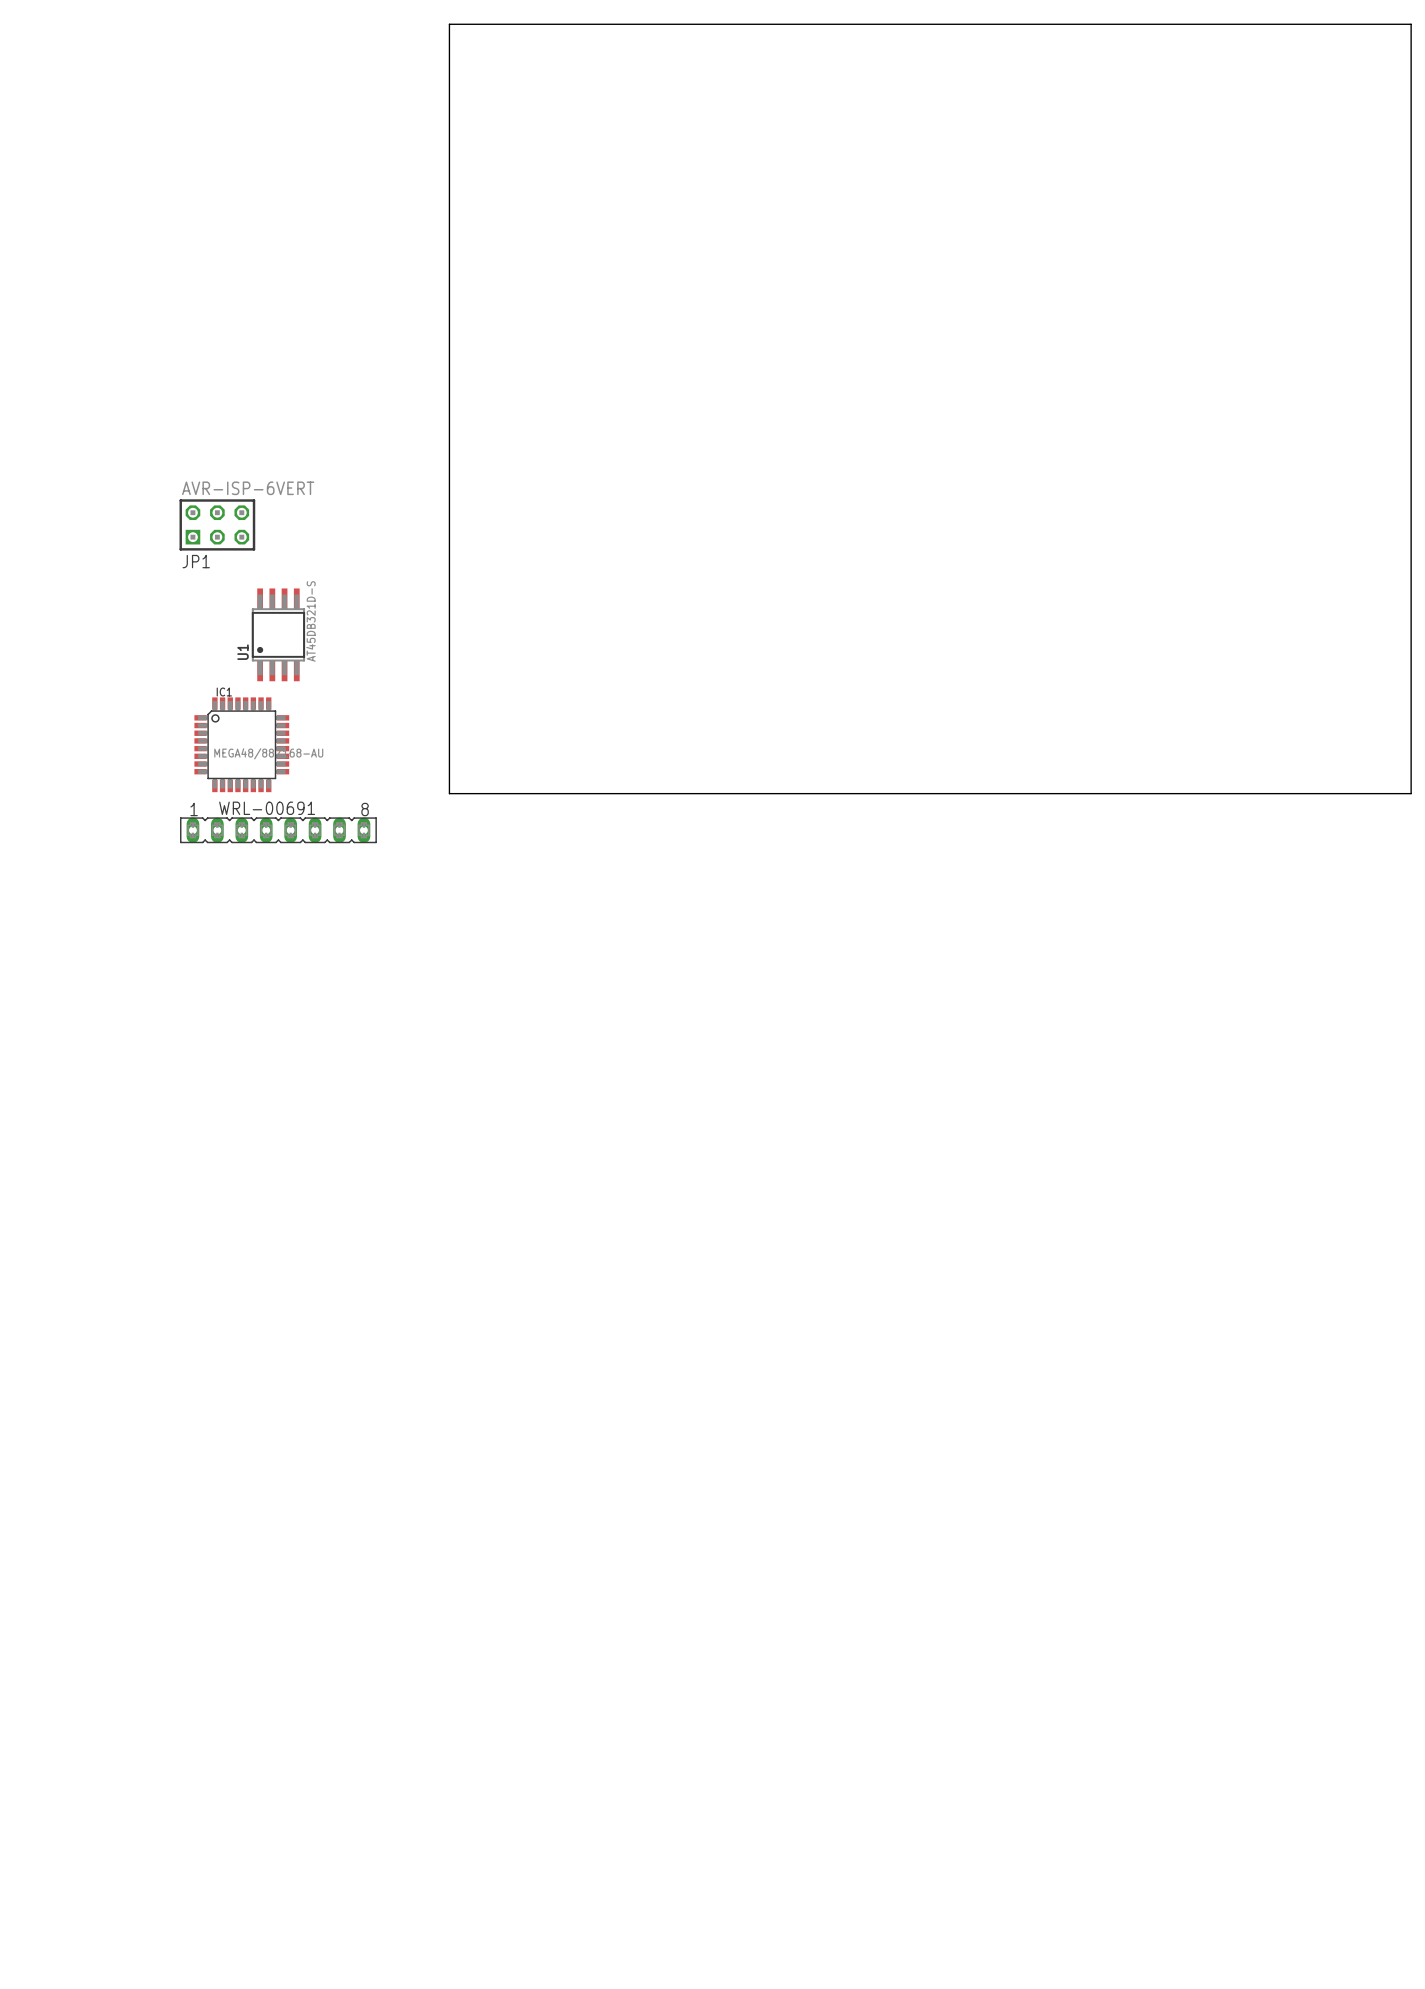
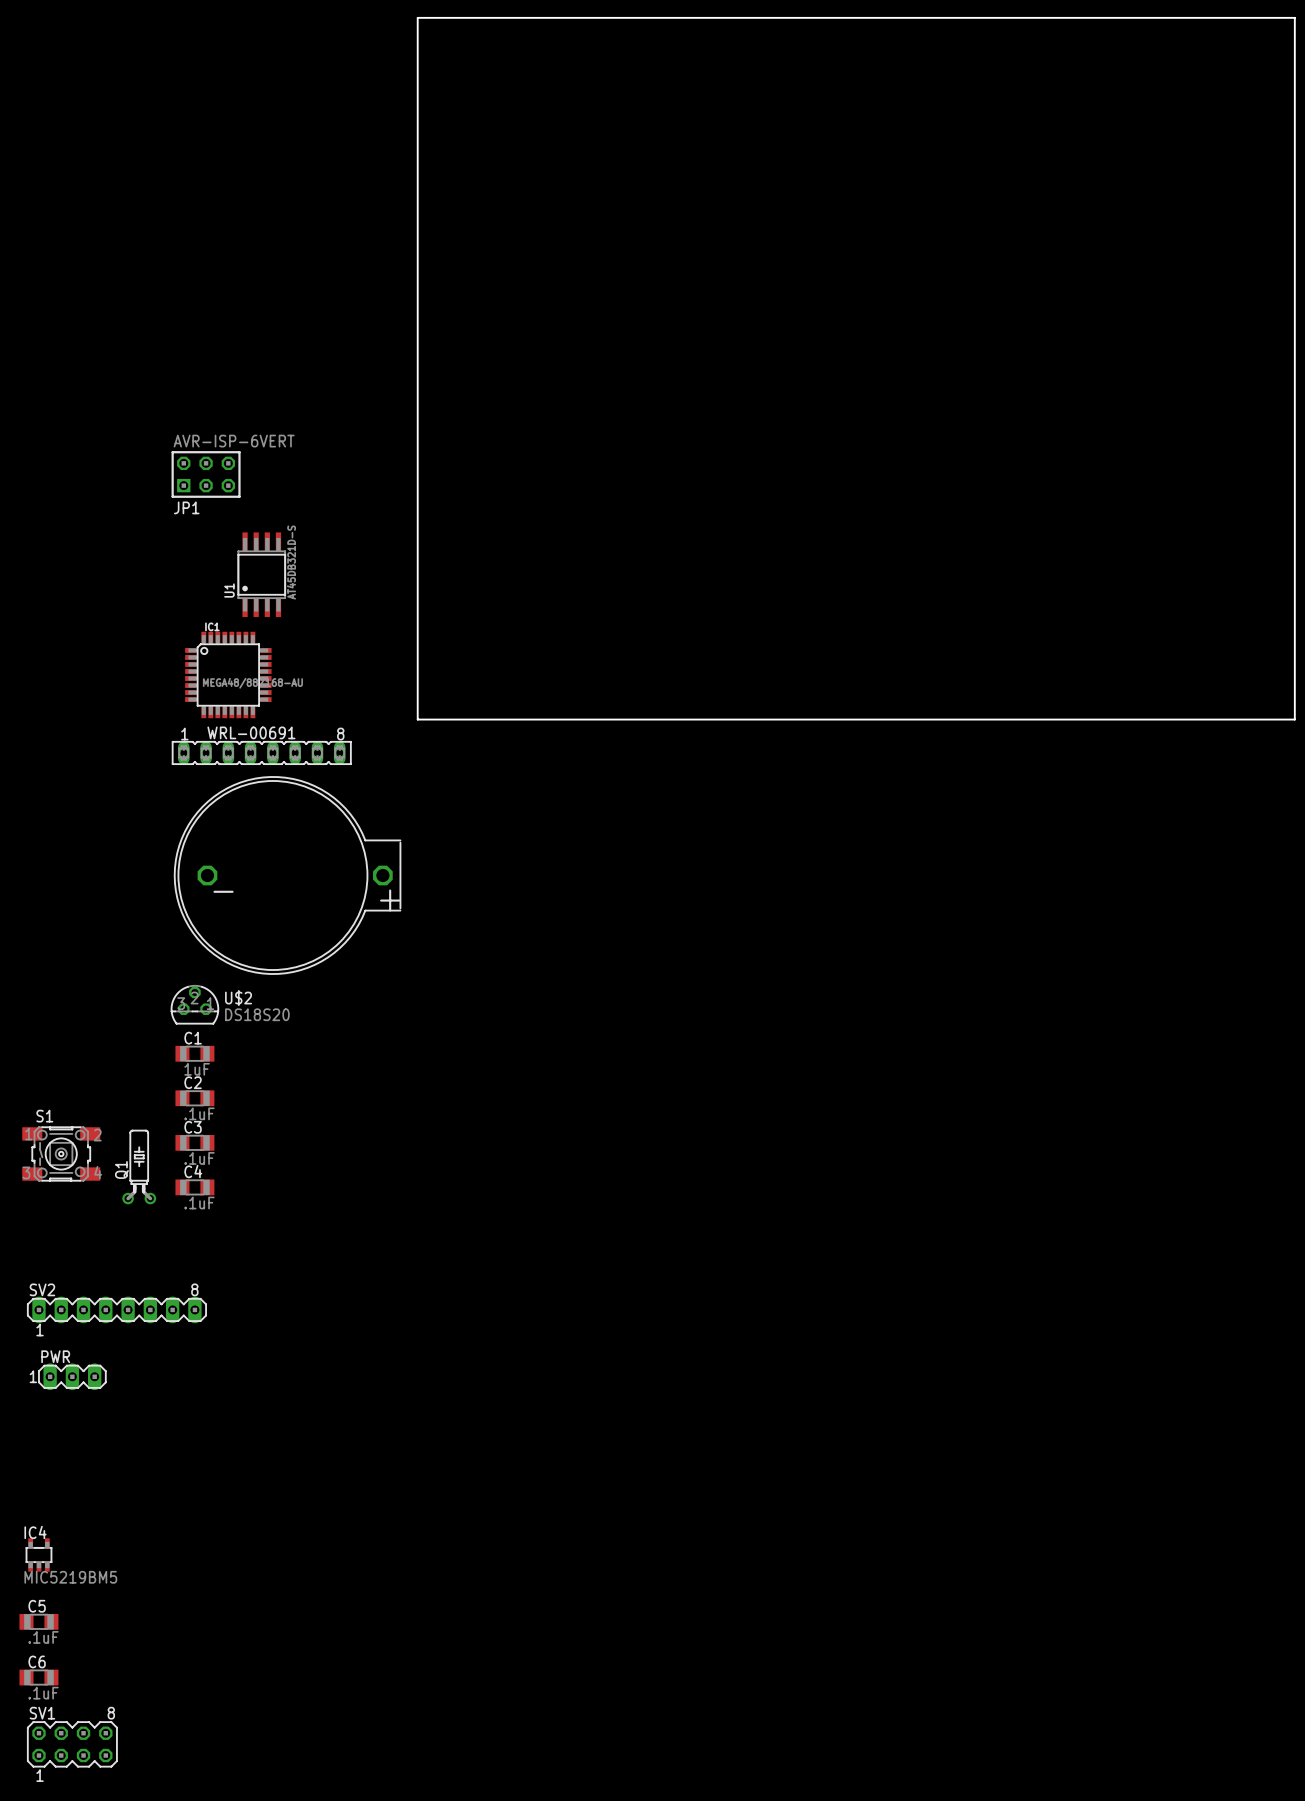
part: none -> (287, 875)
U$2: none -> DS18S20 (194, 1004)
C1: none -> 1uF (194, 1053)
C2: none -> .1uF (194, 1098)
C3: none -> .1uF (194, 1142)
S1: none -> (61, 1153)
Q1: none -> (139, 1167)
C4: none -> .1uF (194, 1187)
SV2: none -> (116, 1309)
PWR: none -> (72, 1376)
IC4: none -> MIC5219BM5 (38, 1555)
C5: none -> .1uF (38, 1621)
C6: none -> .1uF (38, 1677)
SV1: none -> (72, 1744)

